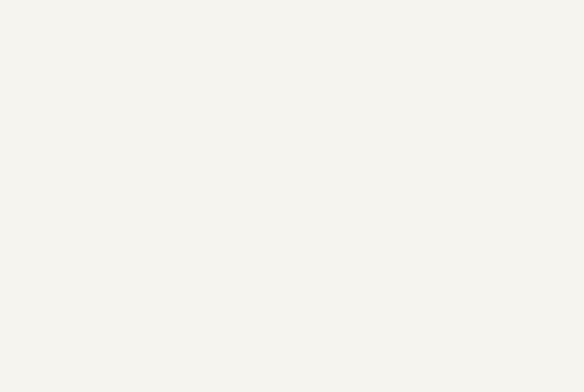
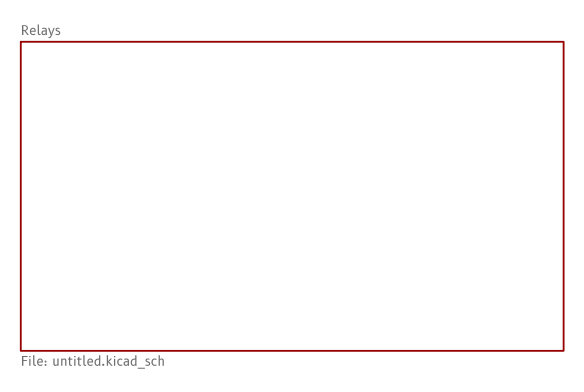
sheet Relays: none -> File: untitled.kicad_sch (292, 196)

